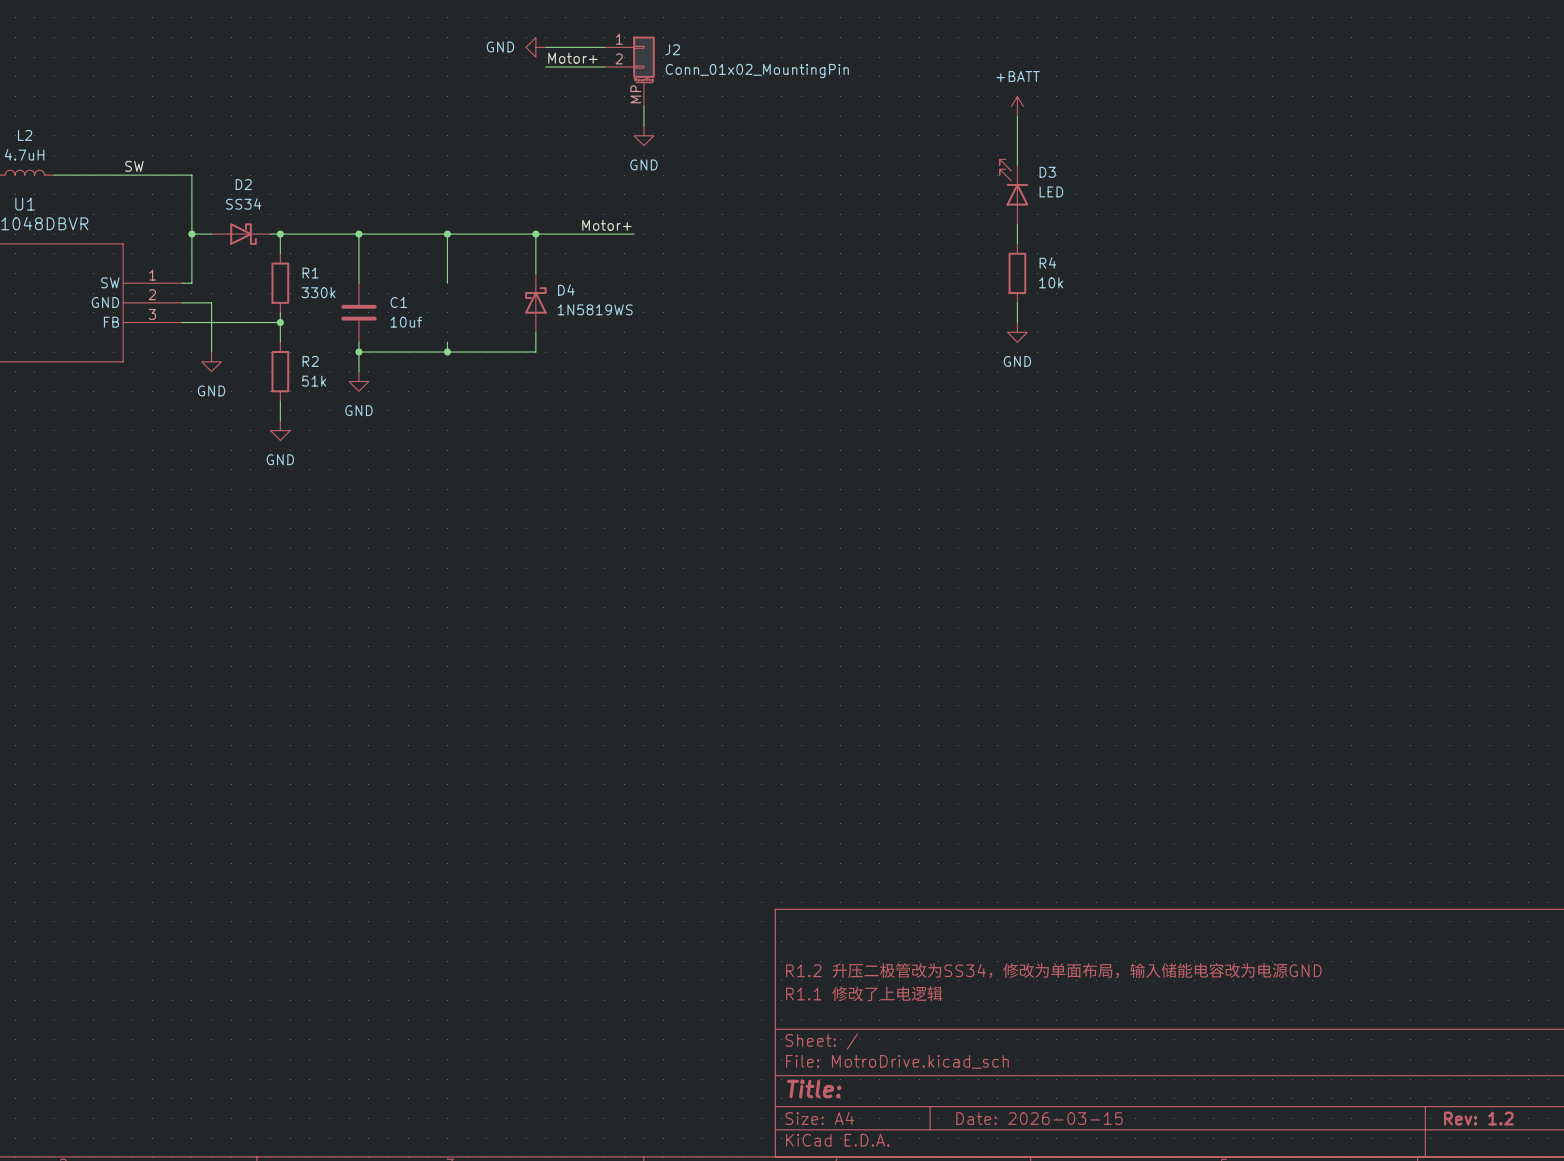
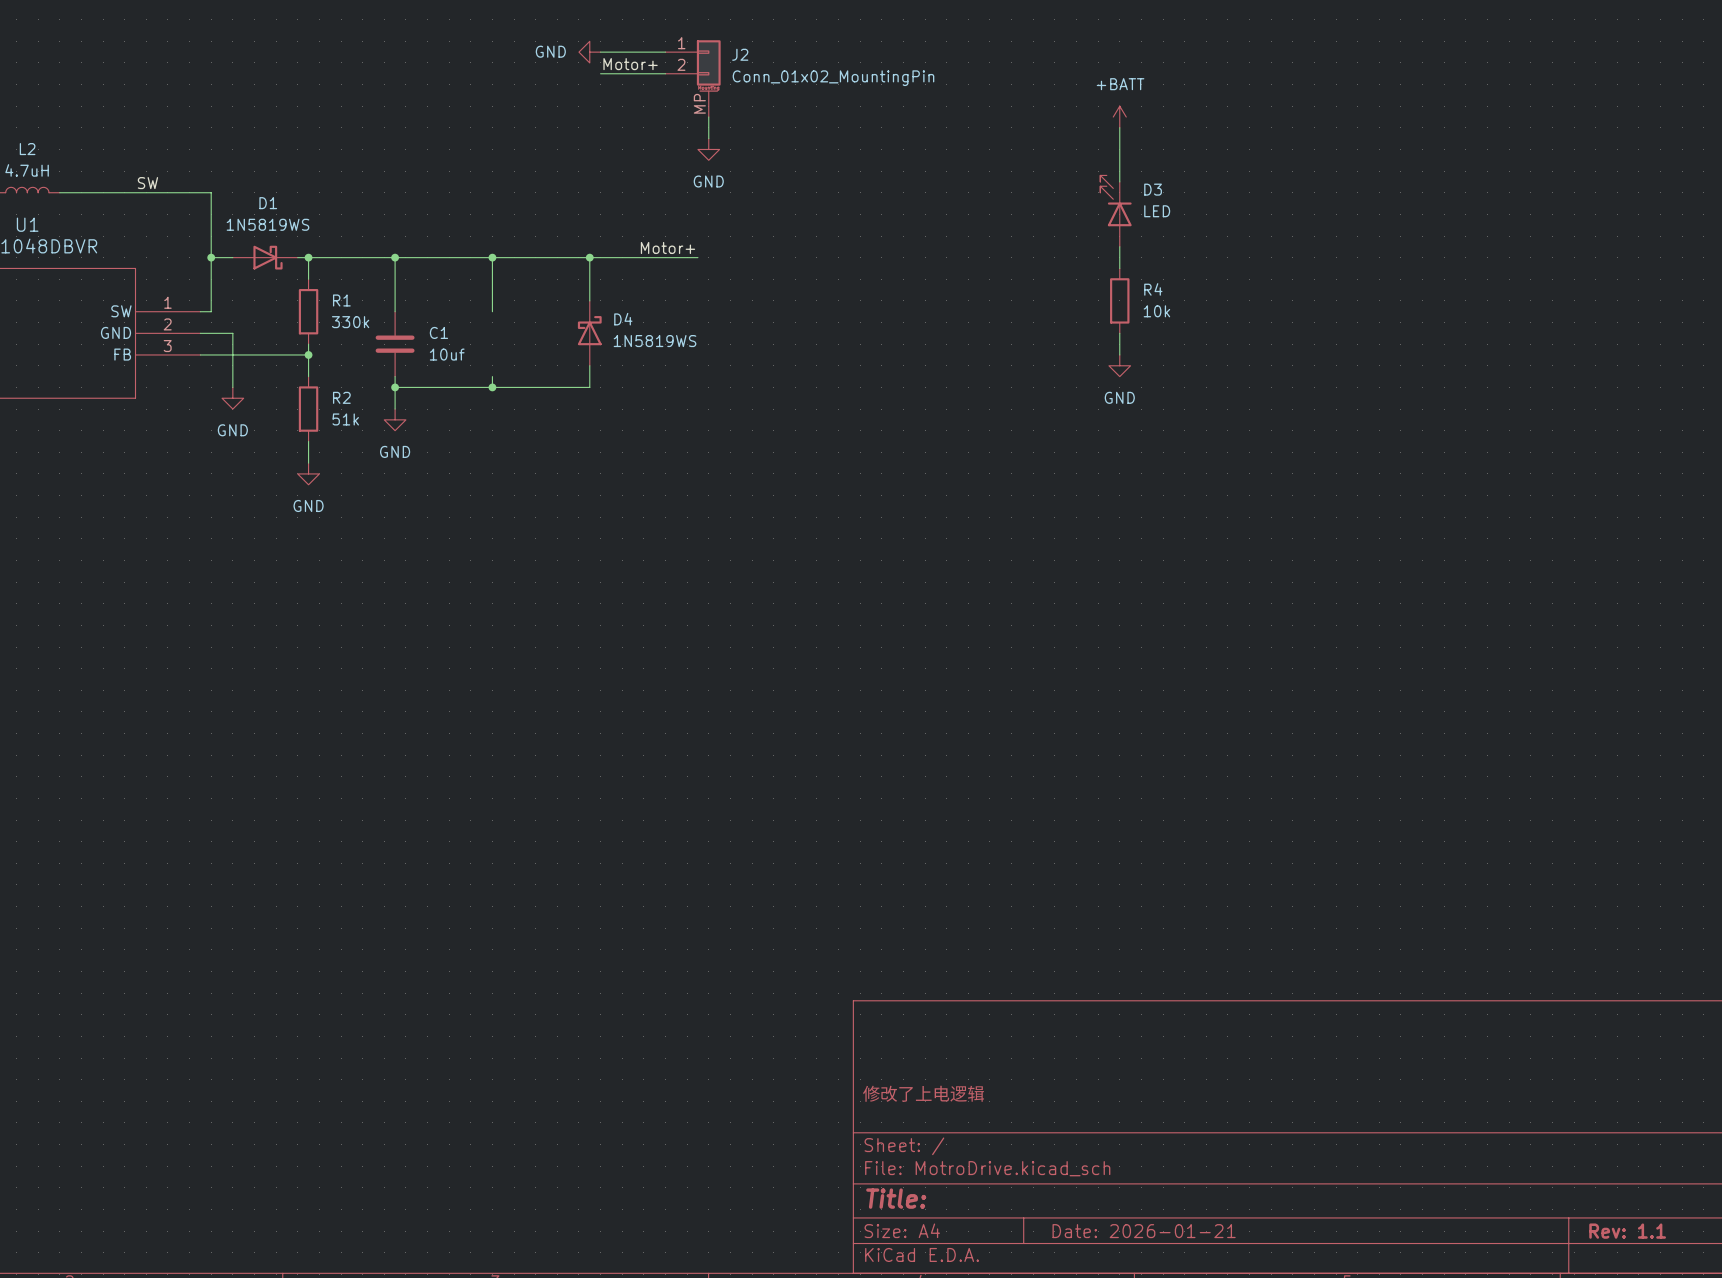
D2 name: D2 (243, 184) -> D1 (268, 203)
D2 value: SS34 (243, 204) -> 1N5819WS (268, 224)
title block: R1.2 升压二极管改为SS34，修改为单面布局，输入储能电容改为电源GND (1053, 970) -> none
title block: R1.1 修改了上电逻辑 (864, 993) -> 修改了上电逻辑 (923, 1093)
title block: Date: 2026-03-15 (1039, 1118) -> Date: 2026-01-21 (1144, 1231)
title block: Rev: 1.2 (1478, 1118) -> Rev: 1.1 (1627, 1231)

